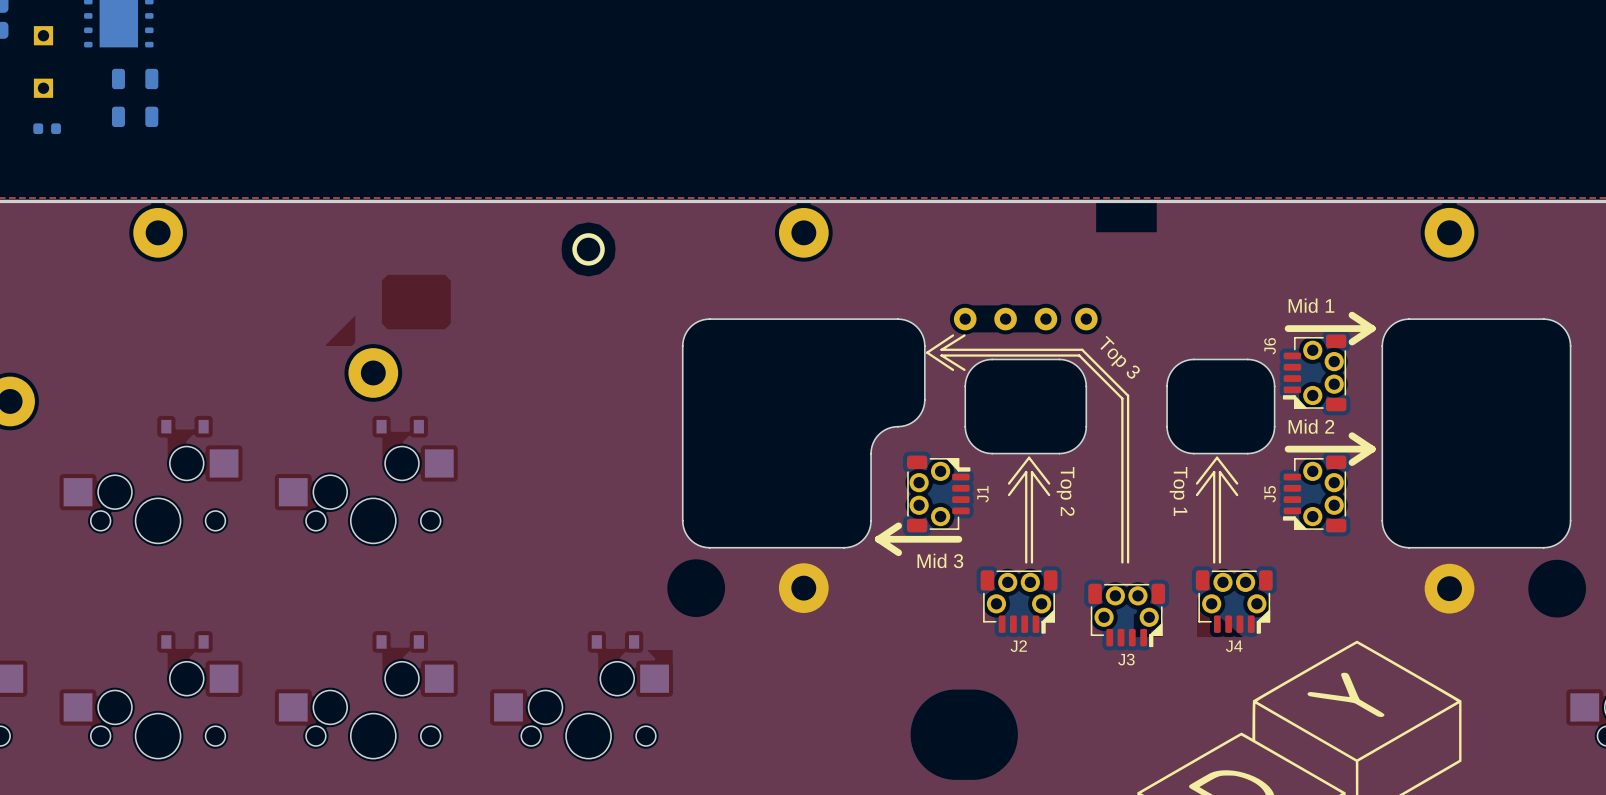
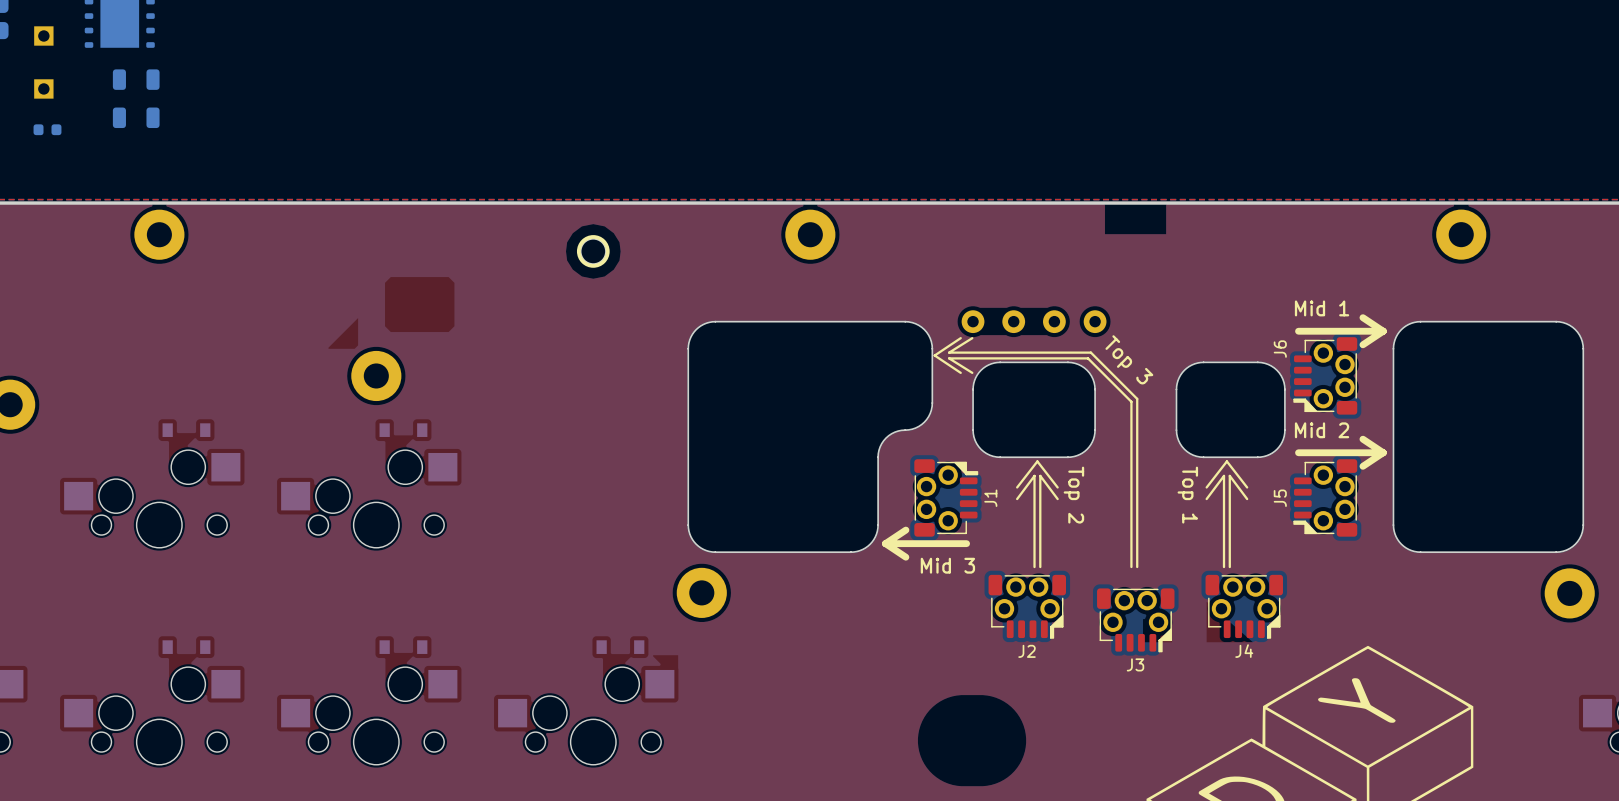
part position: (803, 588) -> (701, 592)
part position: (1449, 588) -> (1569, 593)

